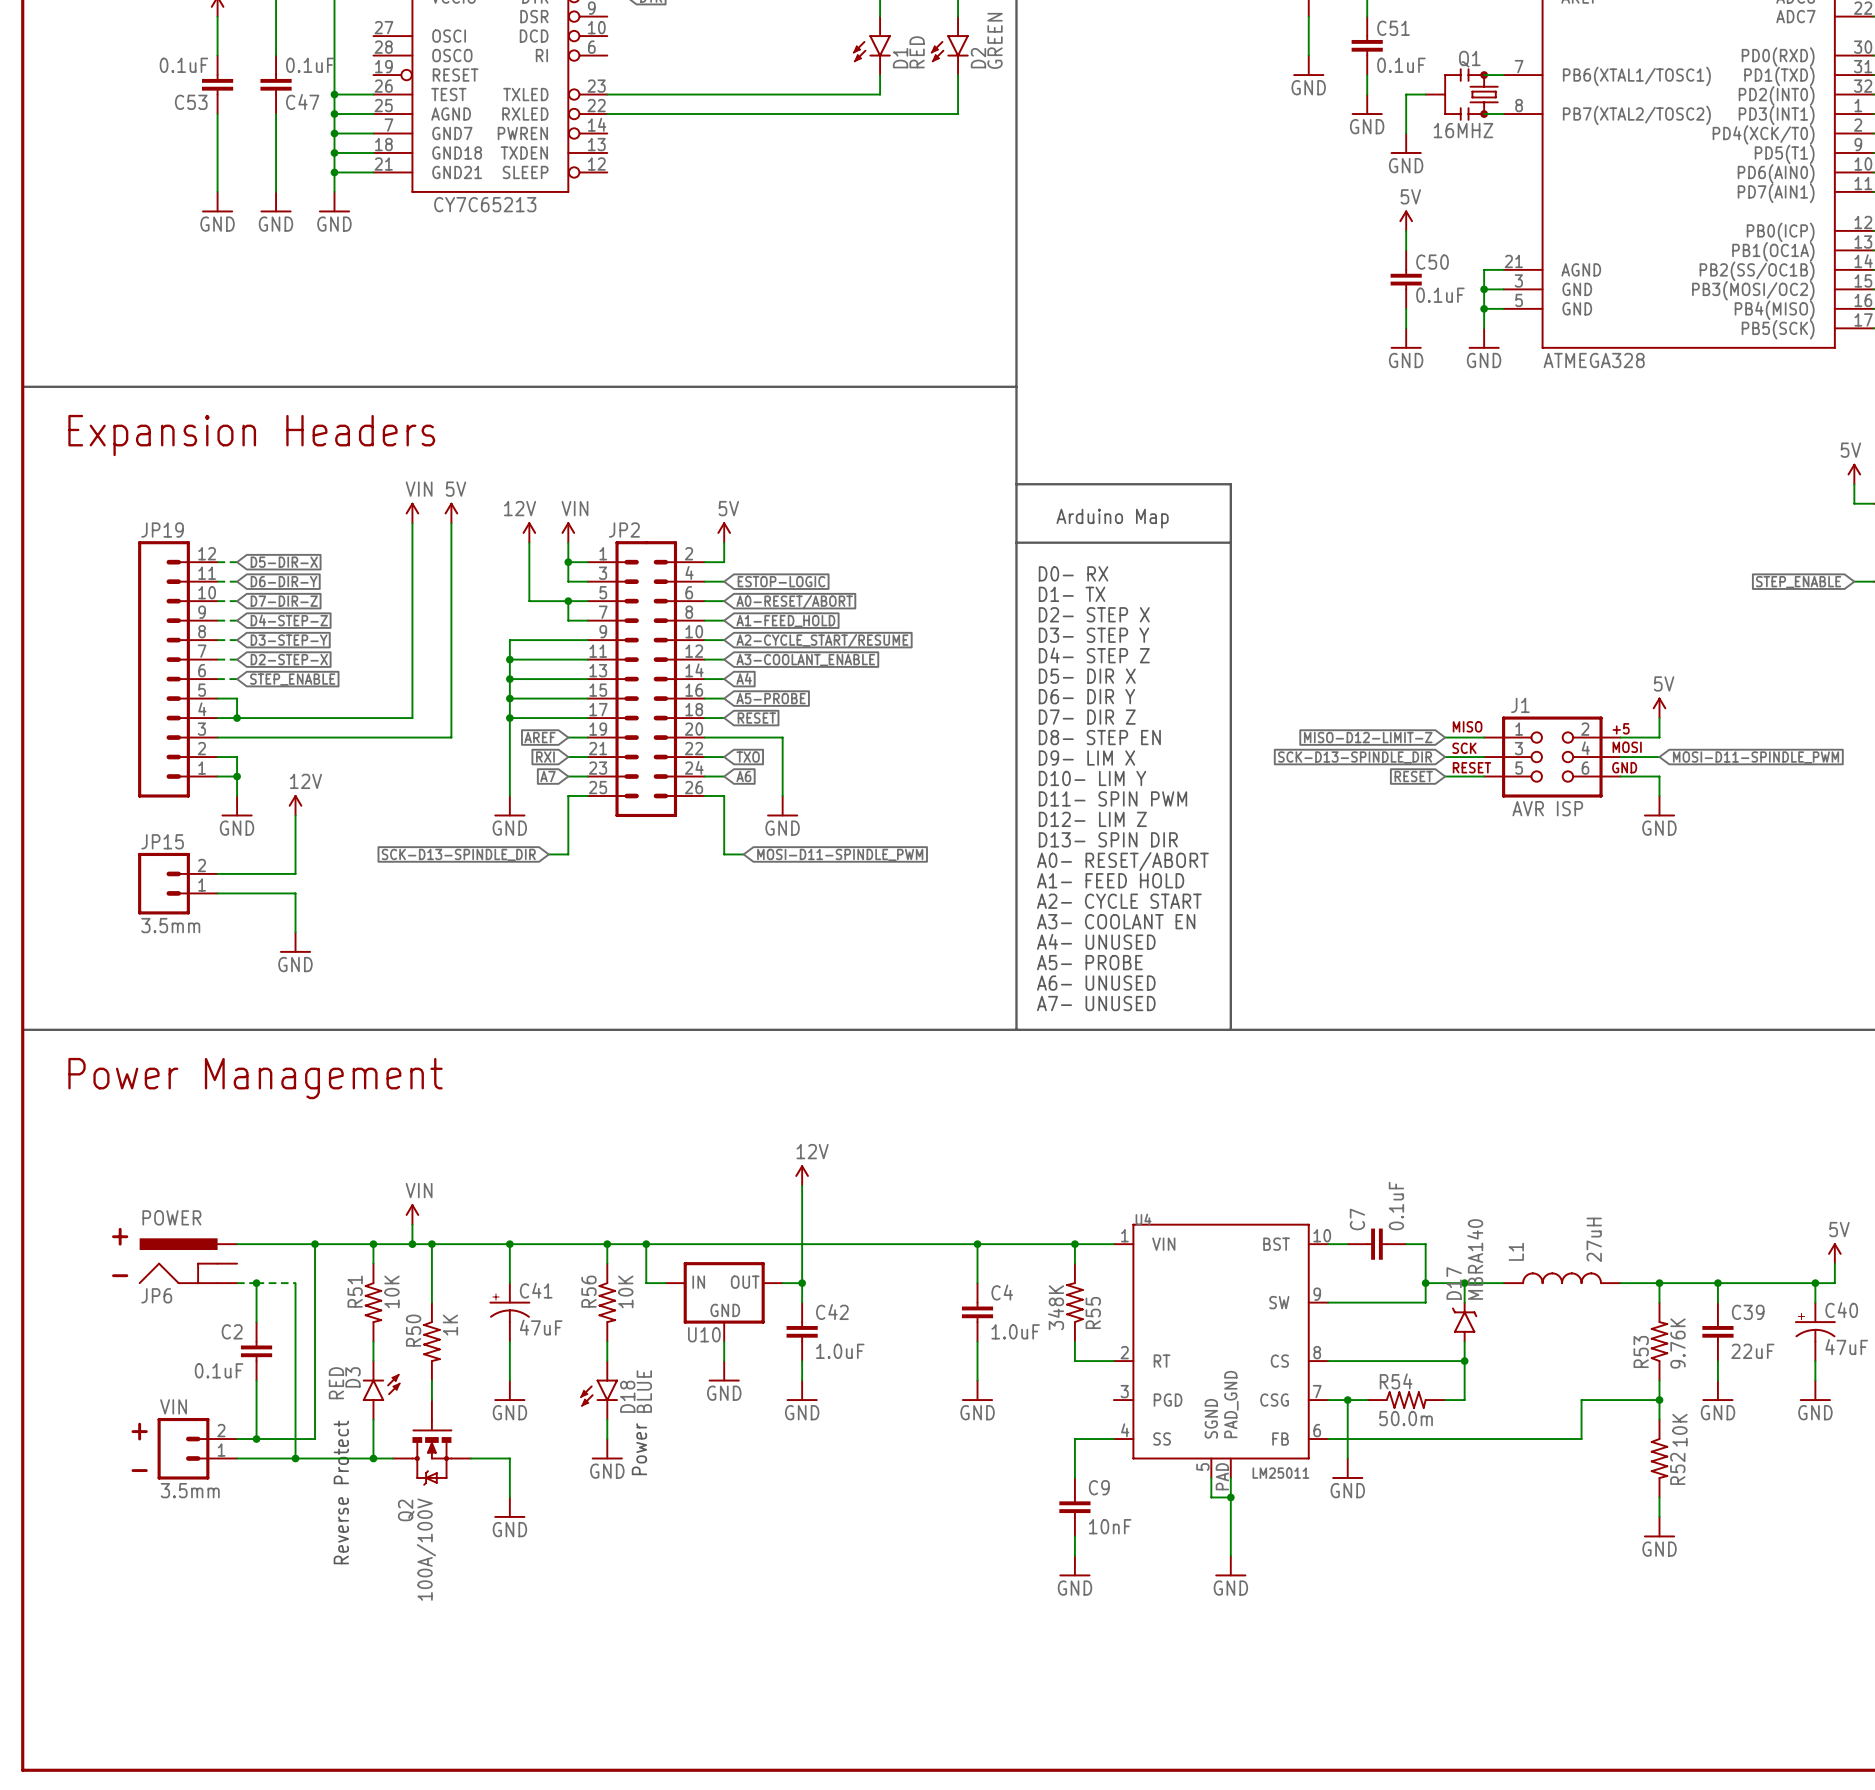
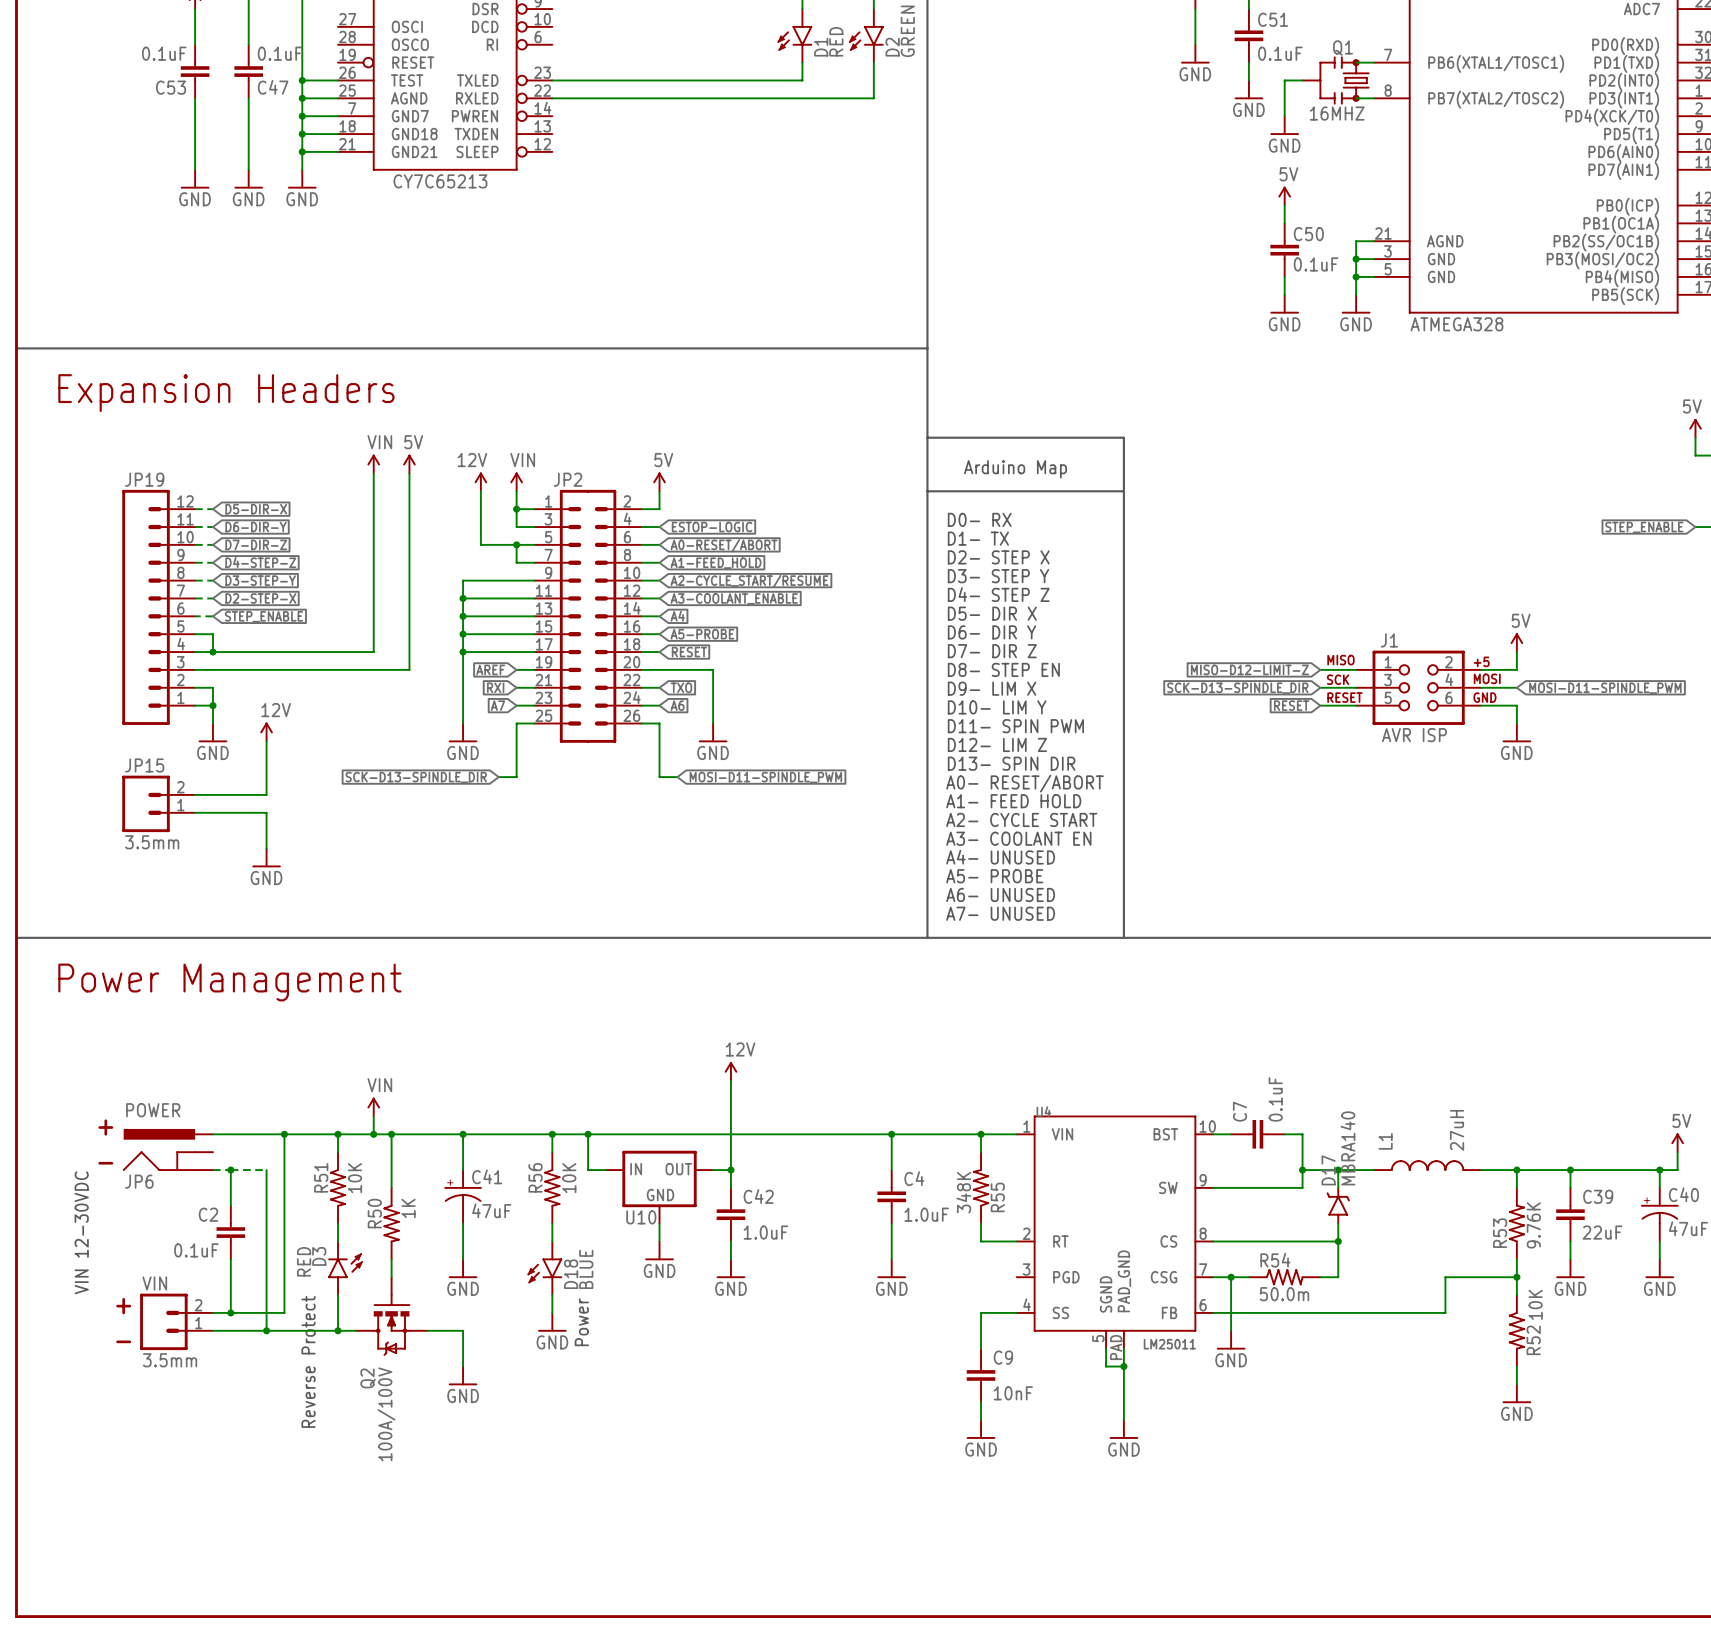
text: none -> VIN 12-30VDC (81, 1232)

